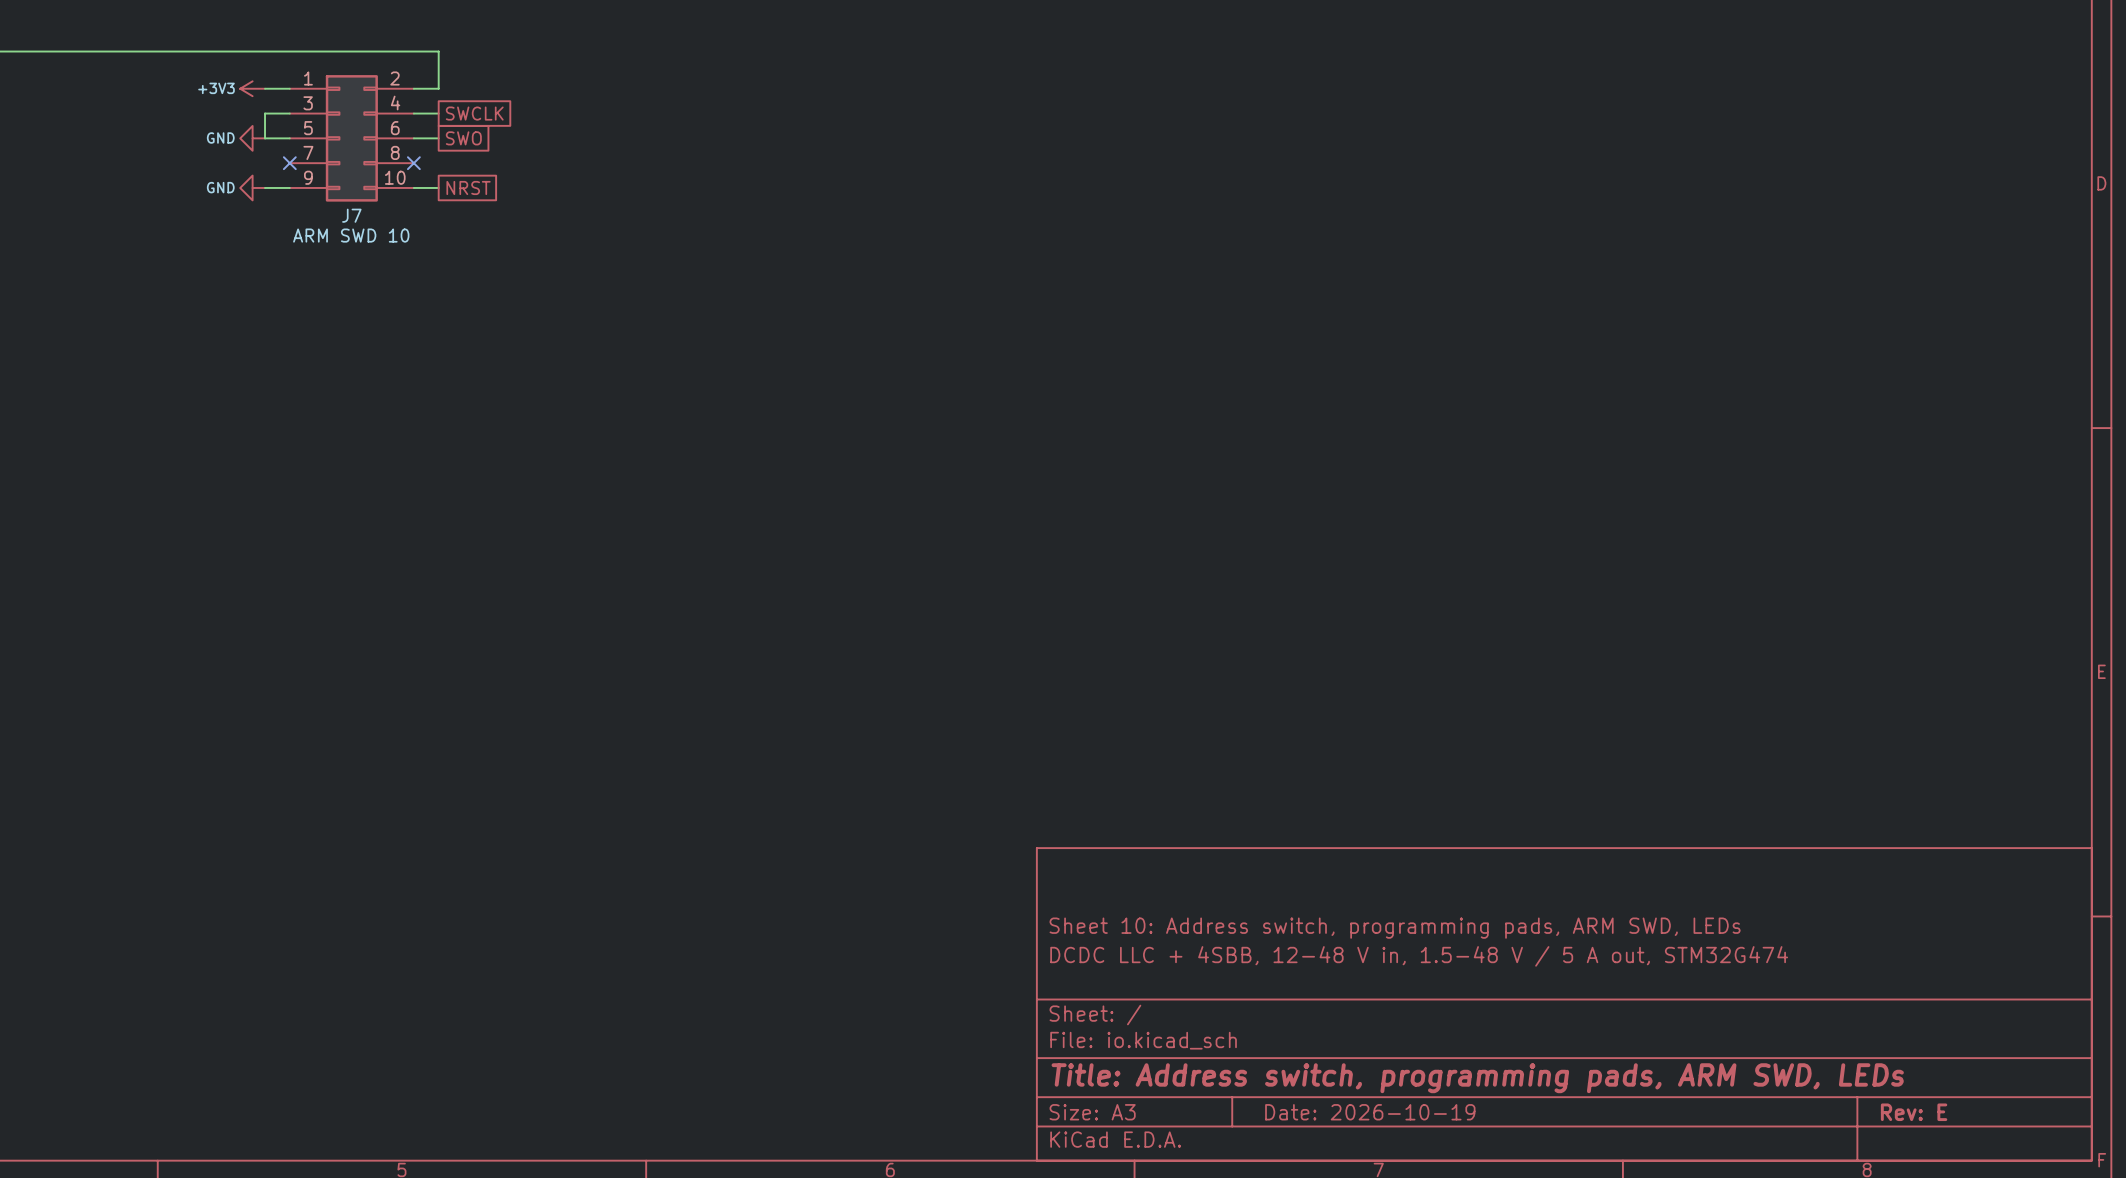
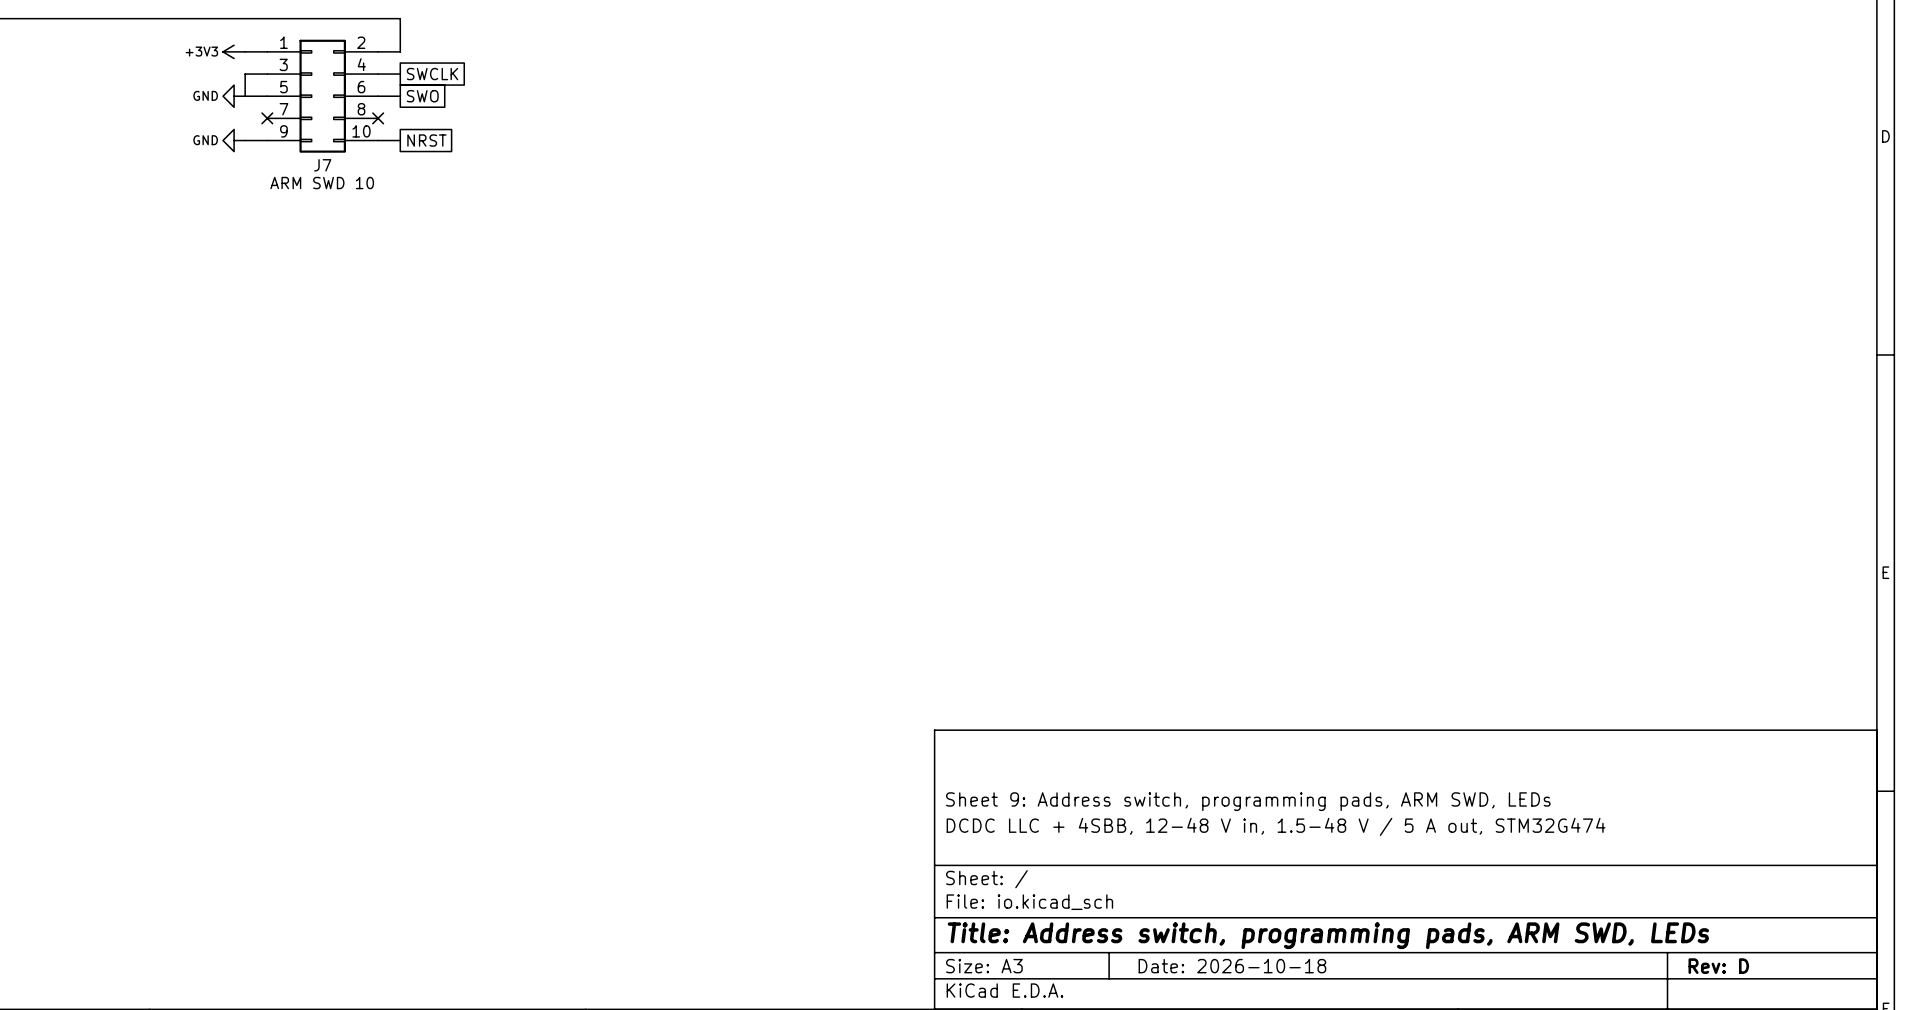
title block: Sheet 10: Address switch, programming pads, ARM SWD, LEDs (1395, 928) -> Sheet 9: Address switch, programming pads, ARM SWD, LEDs (1248, 801)
title block: Date: 2026-10-19 (1370, 1112) -> Date: 2026-10-18 (1232, 966)
title block: Rev: E (1914, 1112) -> Rev: D (1718, 966)

